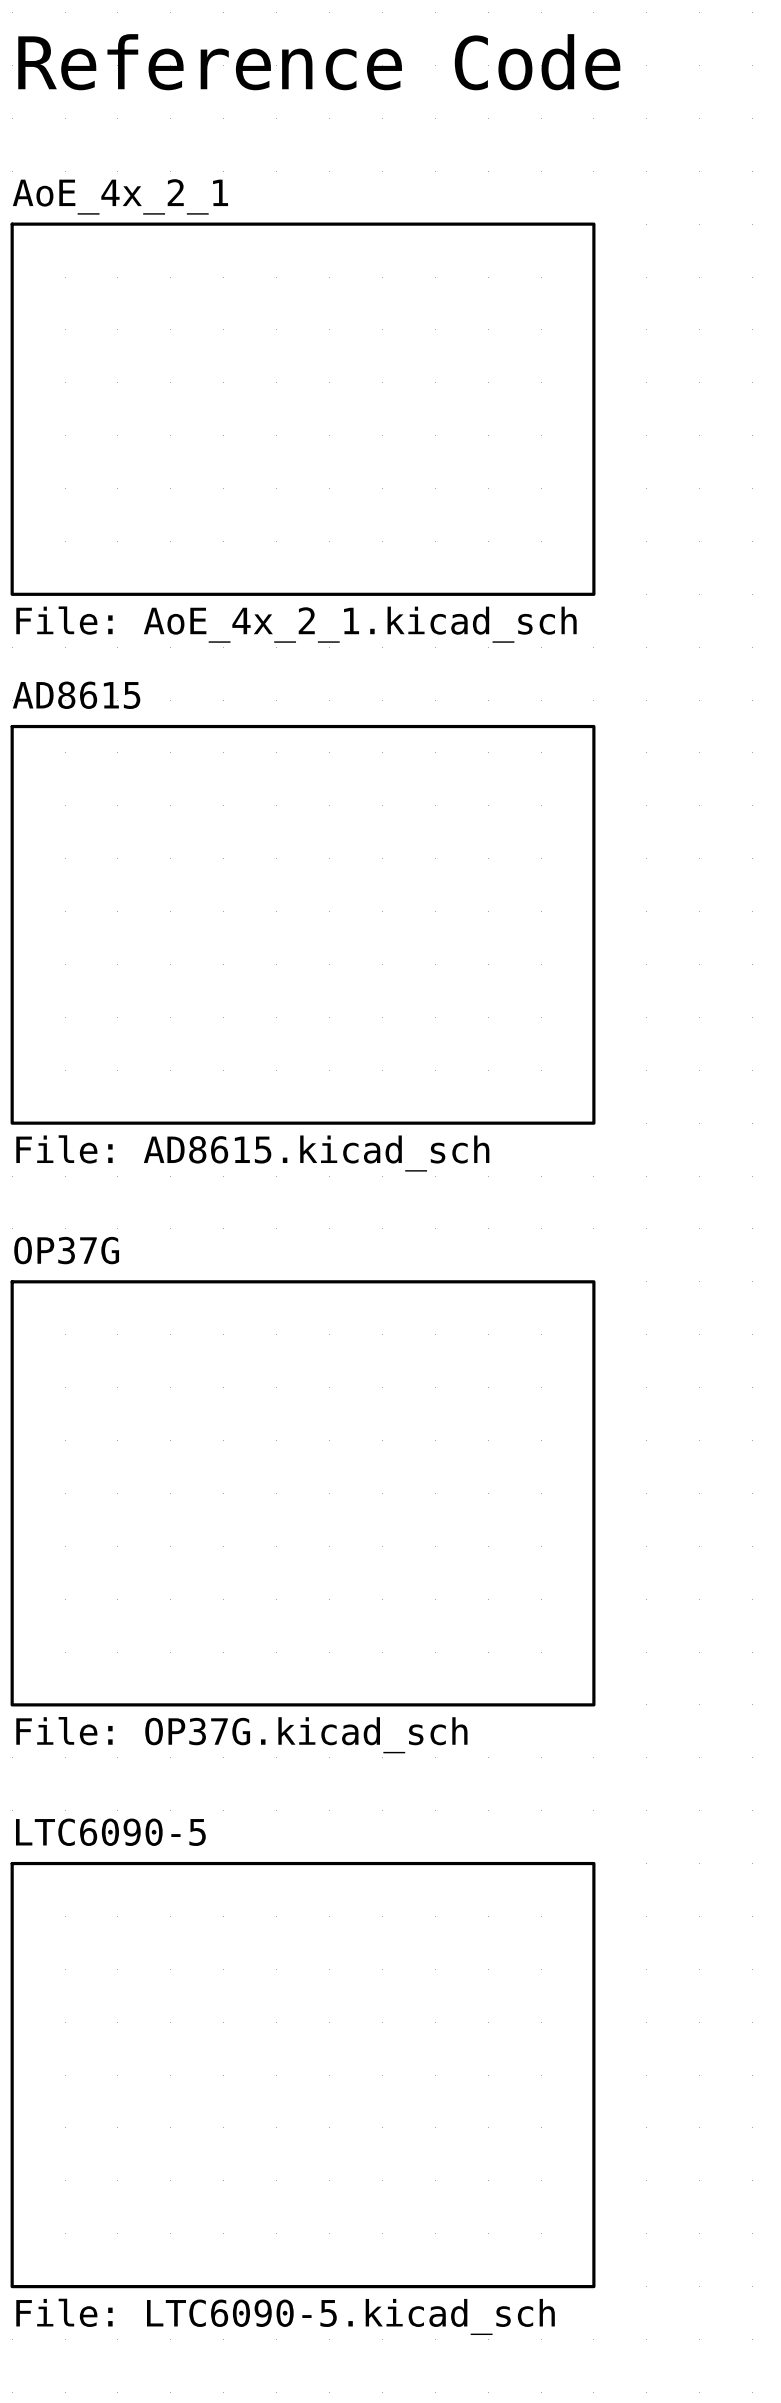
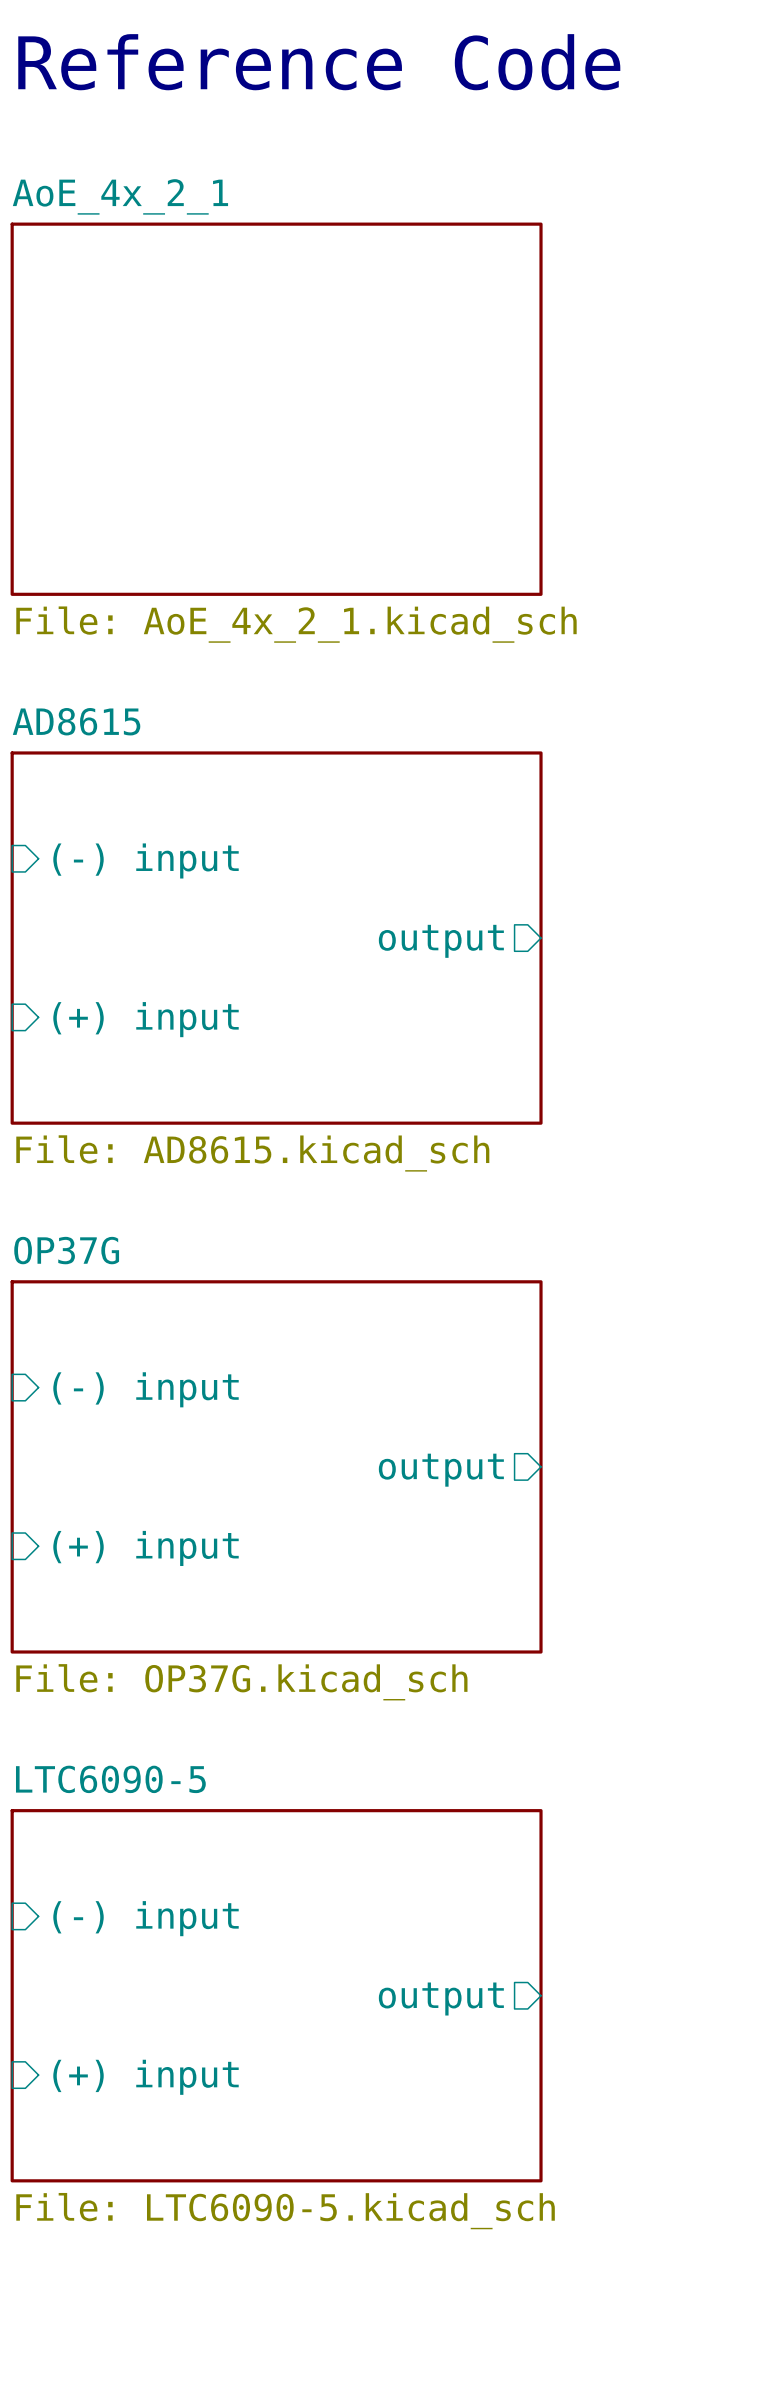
sheet AoE_4x_2_1 shape: [10, 222, 596, 596] -> [10, 222, 543, 596]
sheet AD8615 shape: [10, 724, 596, 1125] -> [10, 751, 543, 1125]
sheet pin: none -> (-) input (146, 860)
sheet pin: none -> output (441, 941)
sheet pin: none -> (+) input (146, 1019)
sheet OP37G shape: [10, 1280, 596, 1707] -> [10, 1280, 543, 1654]
sheet pin: none -> (-) input (146, 1389)
sheet pin: none -> output (441, 1470)
sheet pin: none -> (+) input (146, 1548)
sheet LTC6090-5 shape: [10, 1861, 596, 2289] -> [10, 1809, 543, 2183]
sheet pin: none -> (-) input (146, 1918)
sheet pin: none -> output (441, 1999)
sheet pin: none -> (+) input (146, 2077)

